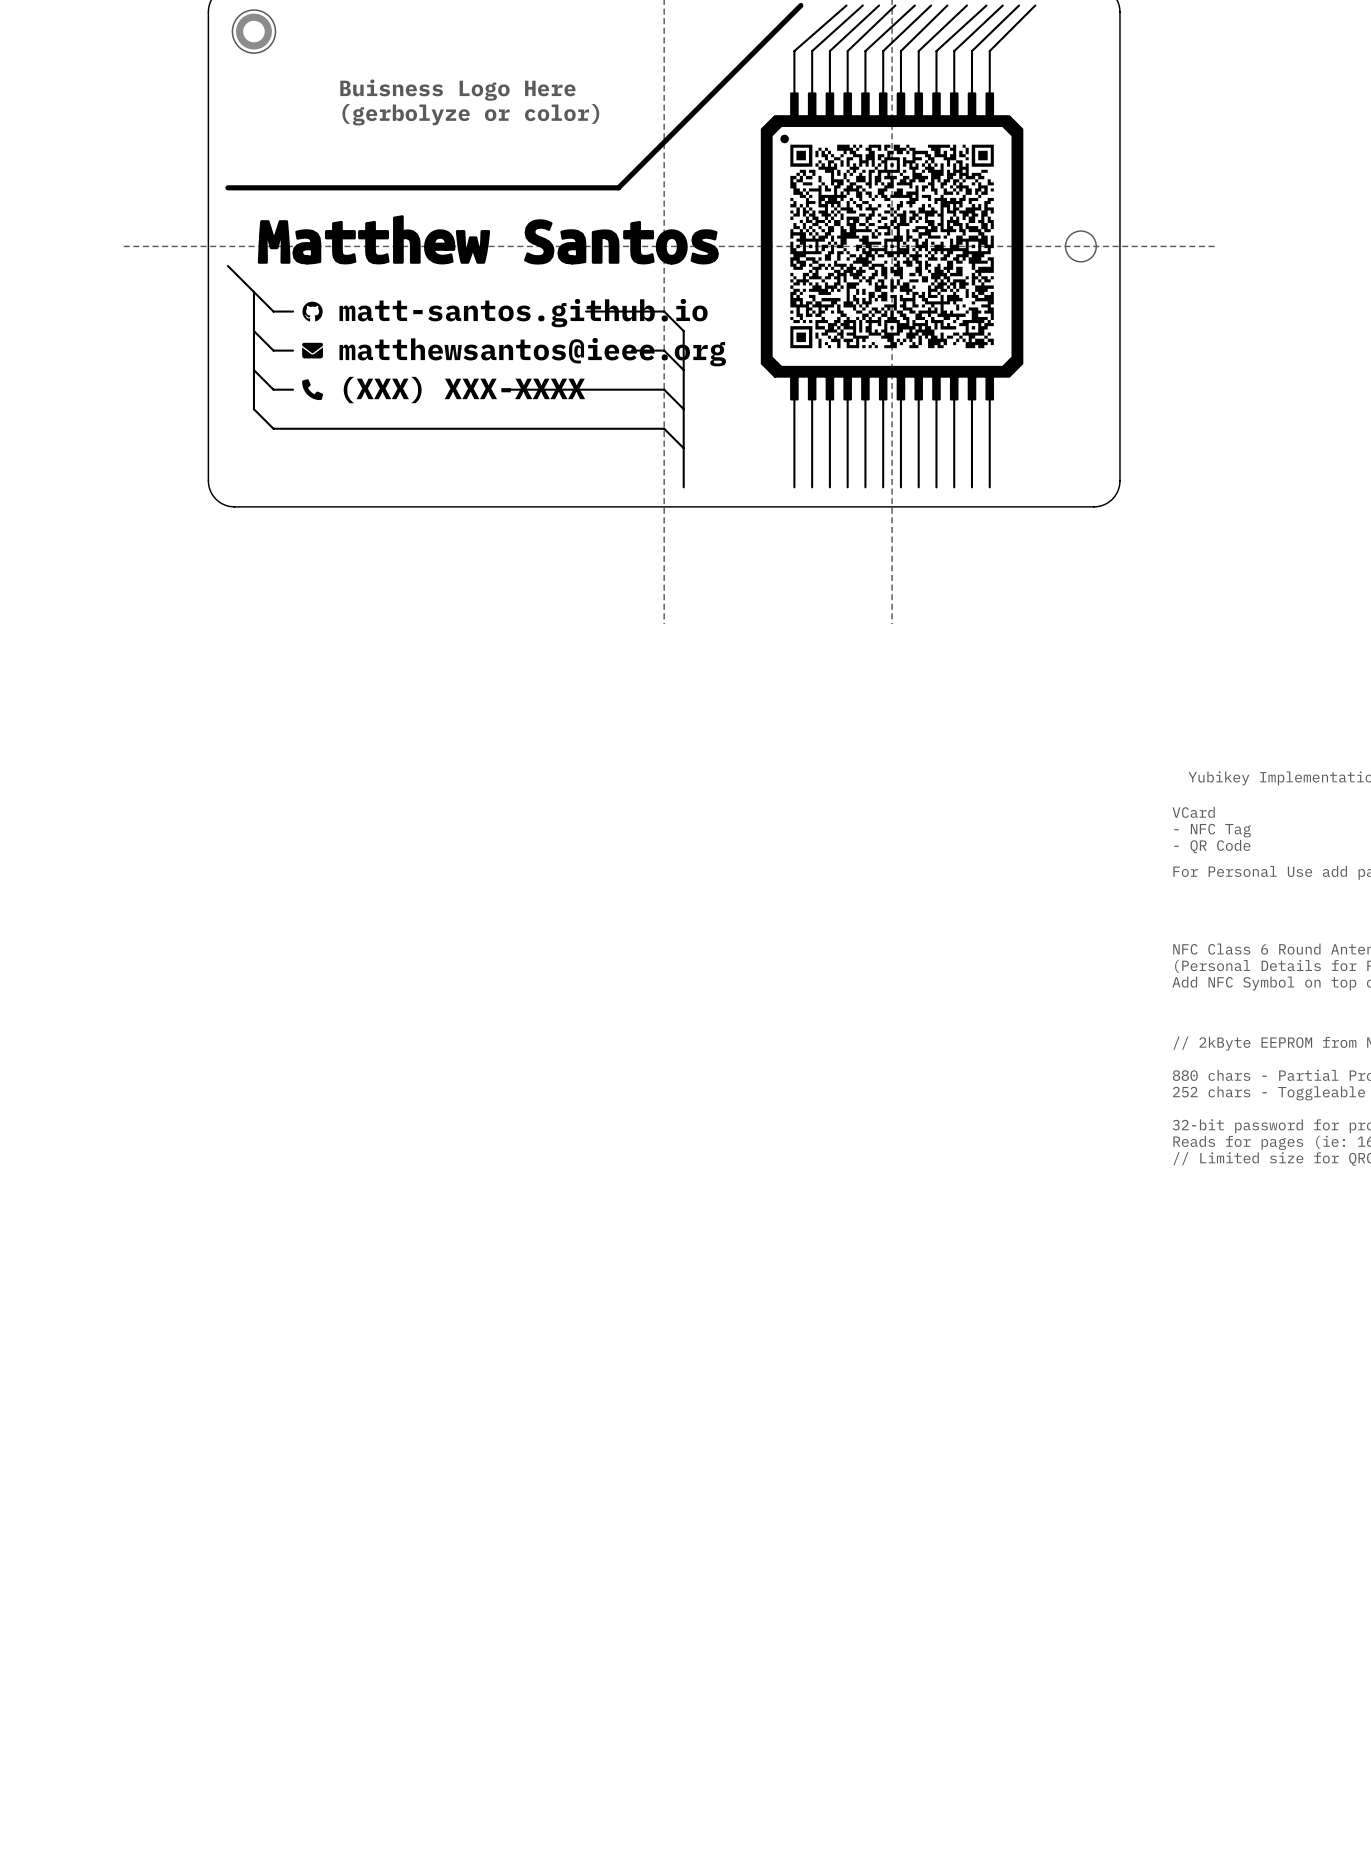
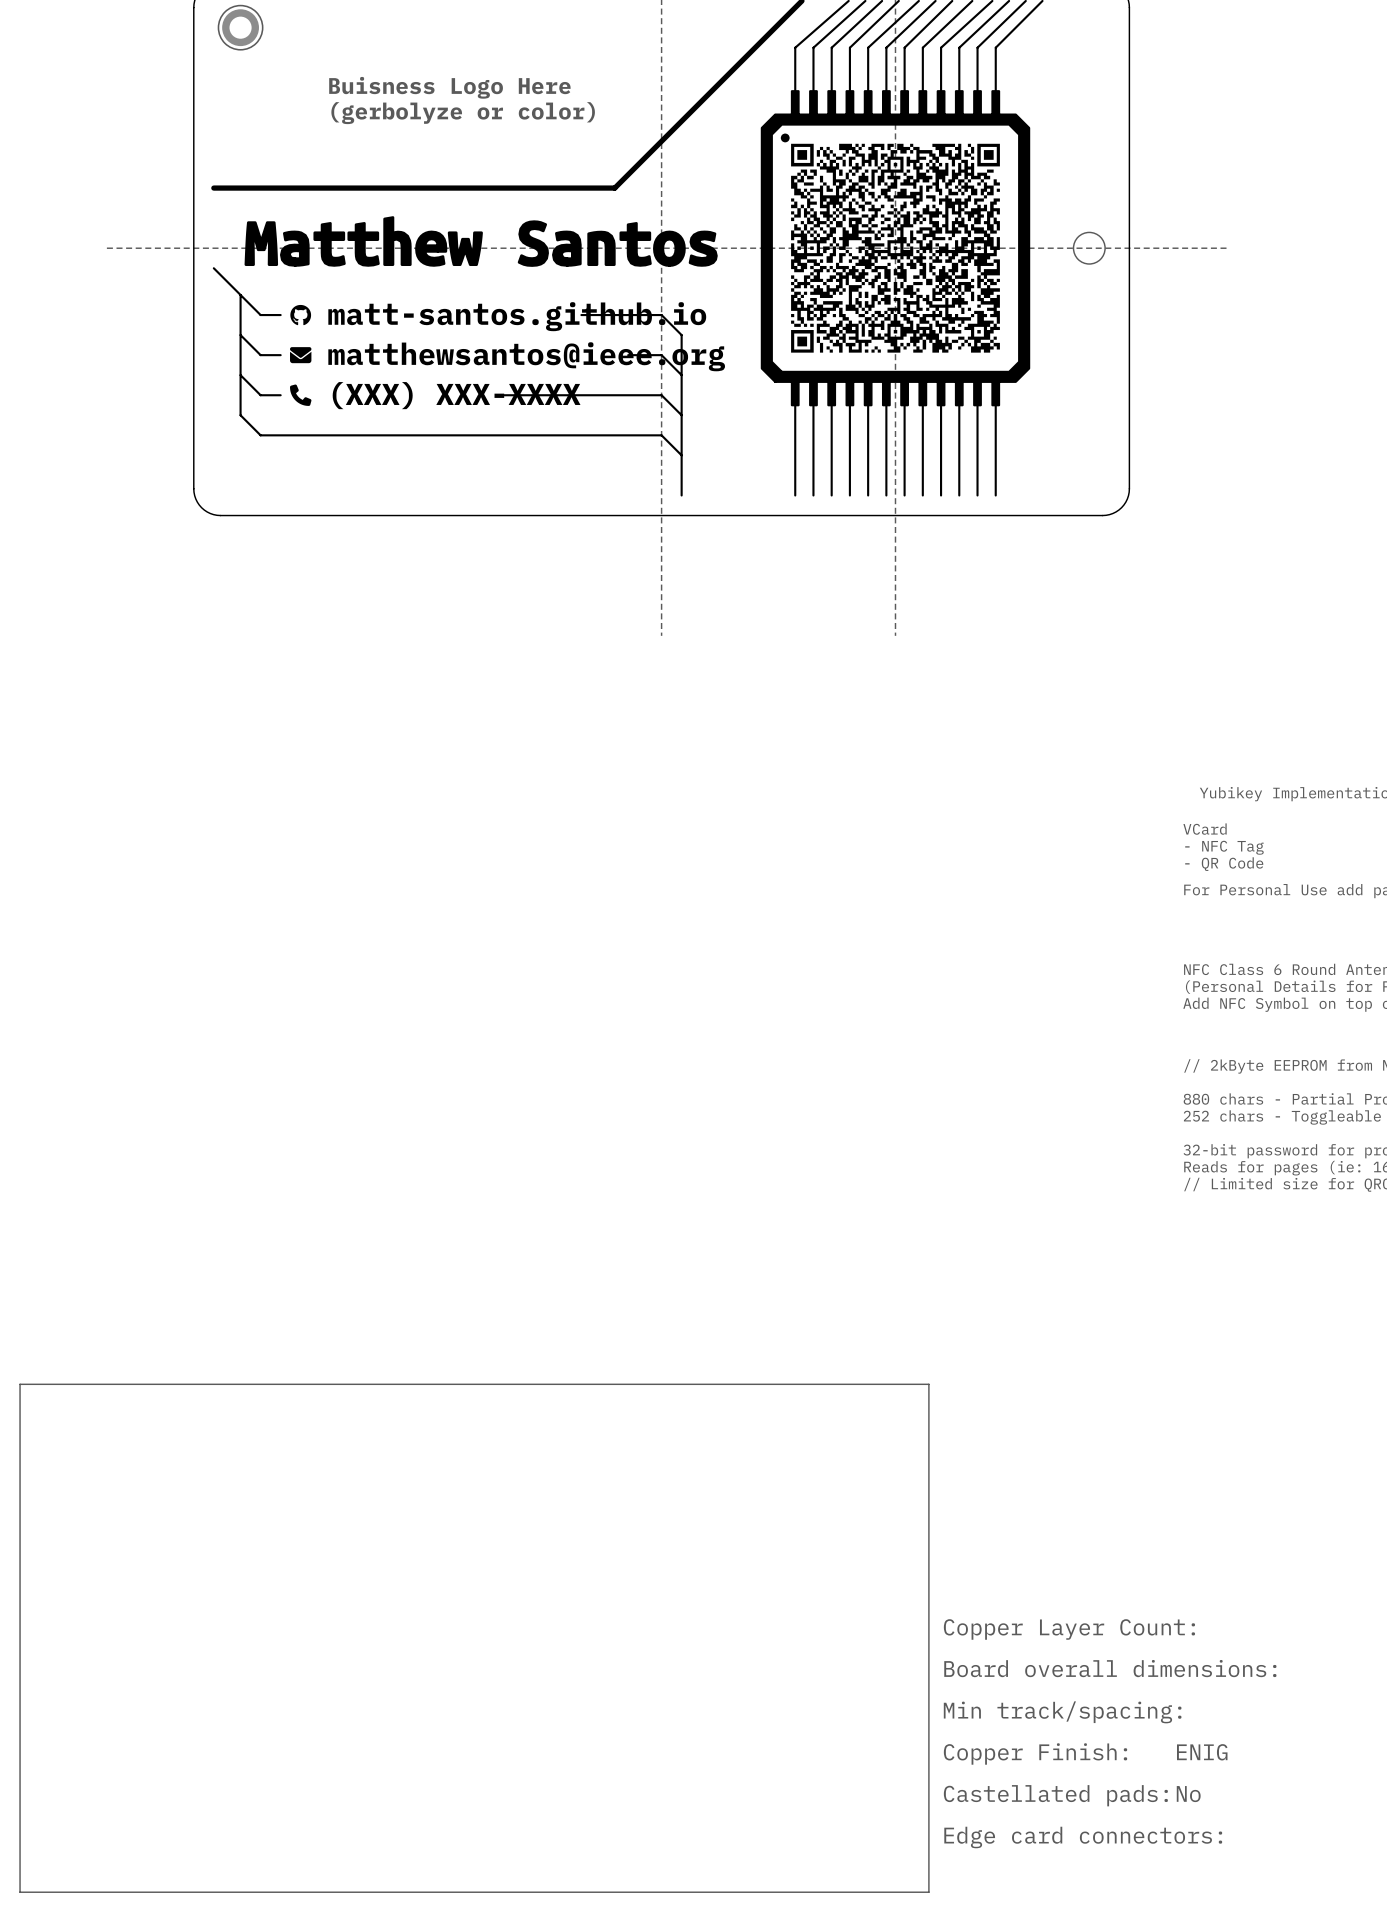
line: none -> (20, 1384) (928, 1384) (928, 1892) (20, 1892) (20, 1384)
text: none -> Copper Layer Count: (1069, 1629)
text: none -> Board overall dimensions: (1110, 1668)
text: none -> Min track/spacing: (1062, 1712)
text: none -> ENIG (1202, 1752)
text: none -> Copper Finish: (1035, 1753)
text: none -> No (1188, 1794)
text: none -> Castellated pads: (1055, 1795)
text: none -> Edge card connectors: (1083, 1837)

